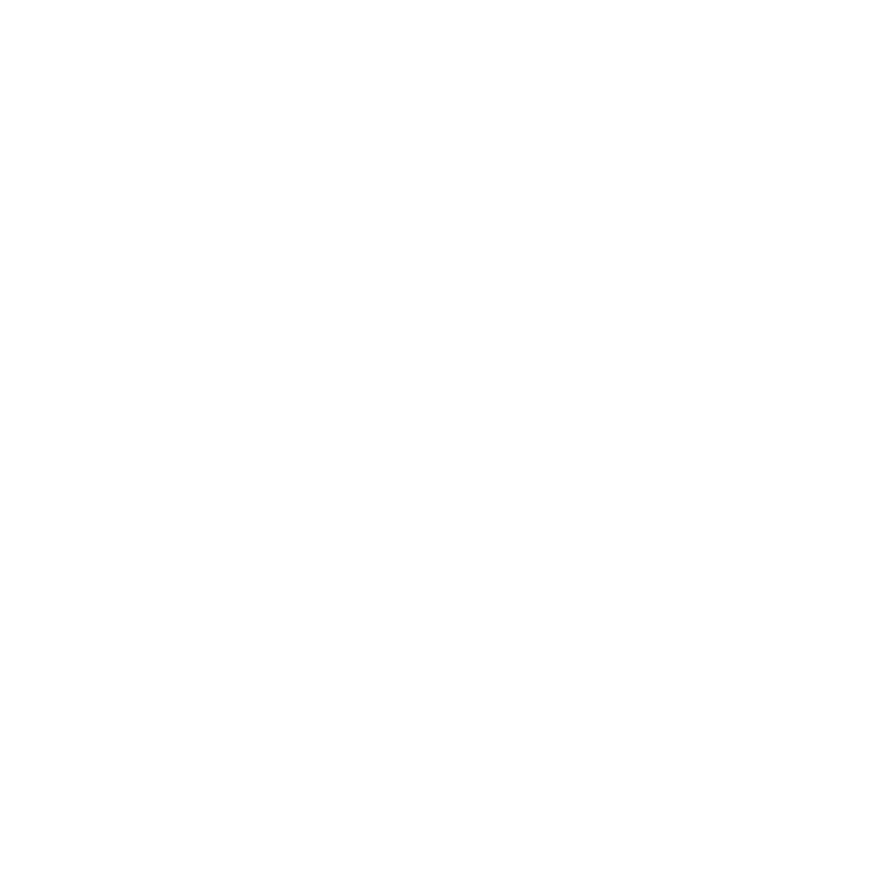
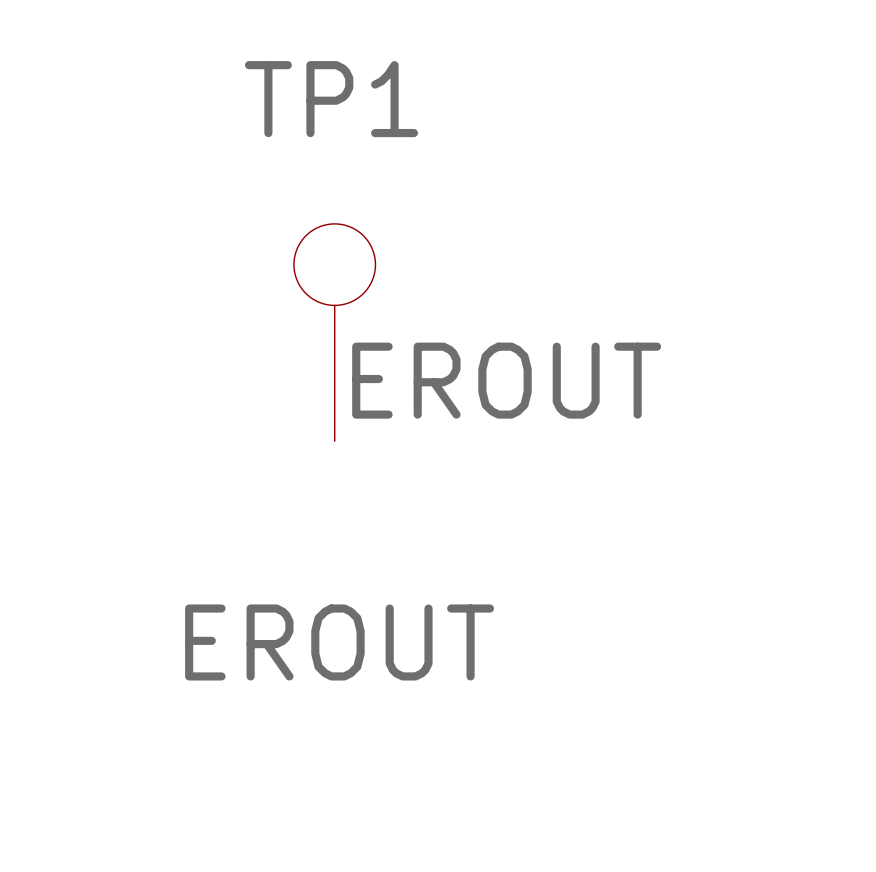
TP1: none -> EROUT (334, 332)
label: none -> EROUT (506, 380)

